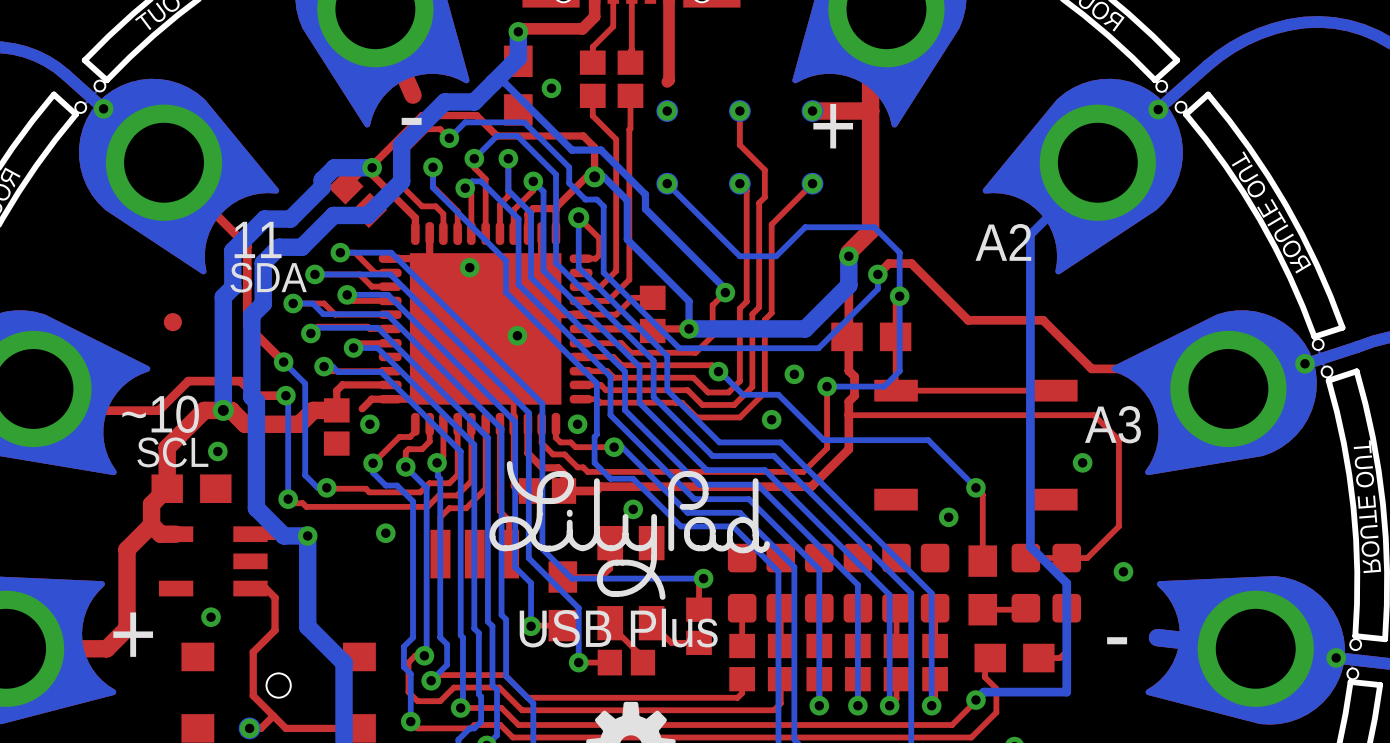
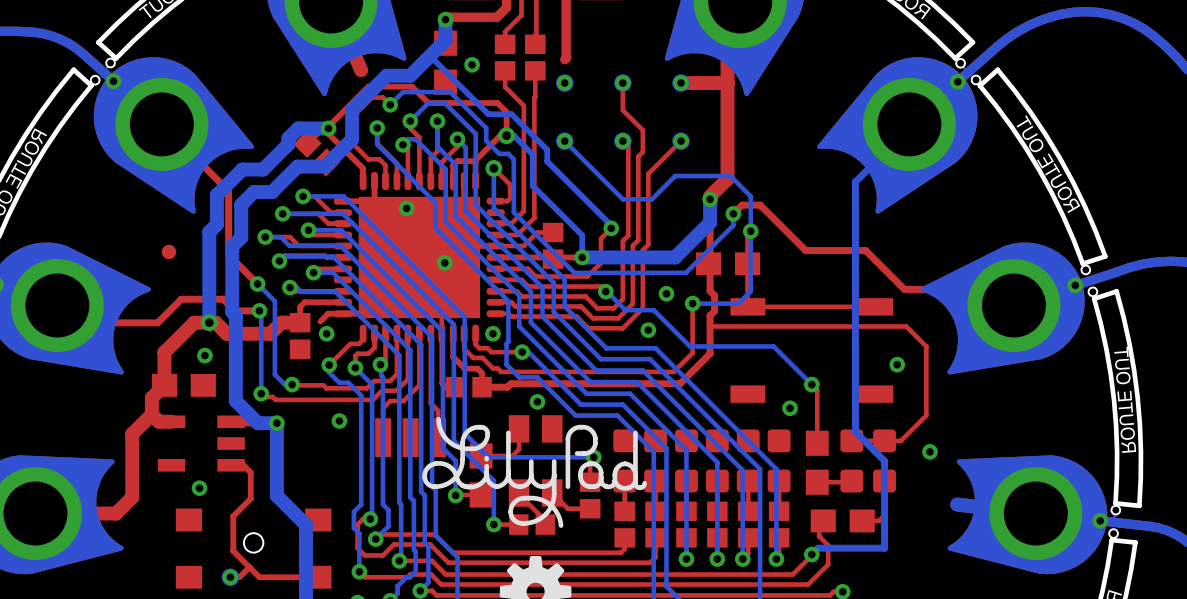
text: - (411, 121) -> none
text: + (833, 126) -> none
text: 11 (258, 239) -> none
text: A2 (1003, 242) -> none
text: SDA (268, 277) -> none
text: ~10 (160, 414) -> none
text: A3 (1112, 424) -> none
text: SCL (172, 452) -> none
drawing position: (629, 530) -> (534, 472)
text: USB Plus (618, 628) -> none
text: + (133, 634) -> none
text: - (1117, 640) -> none

